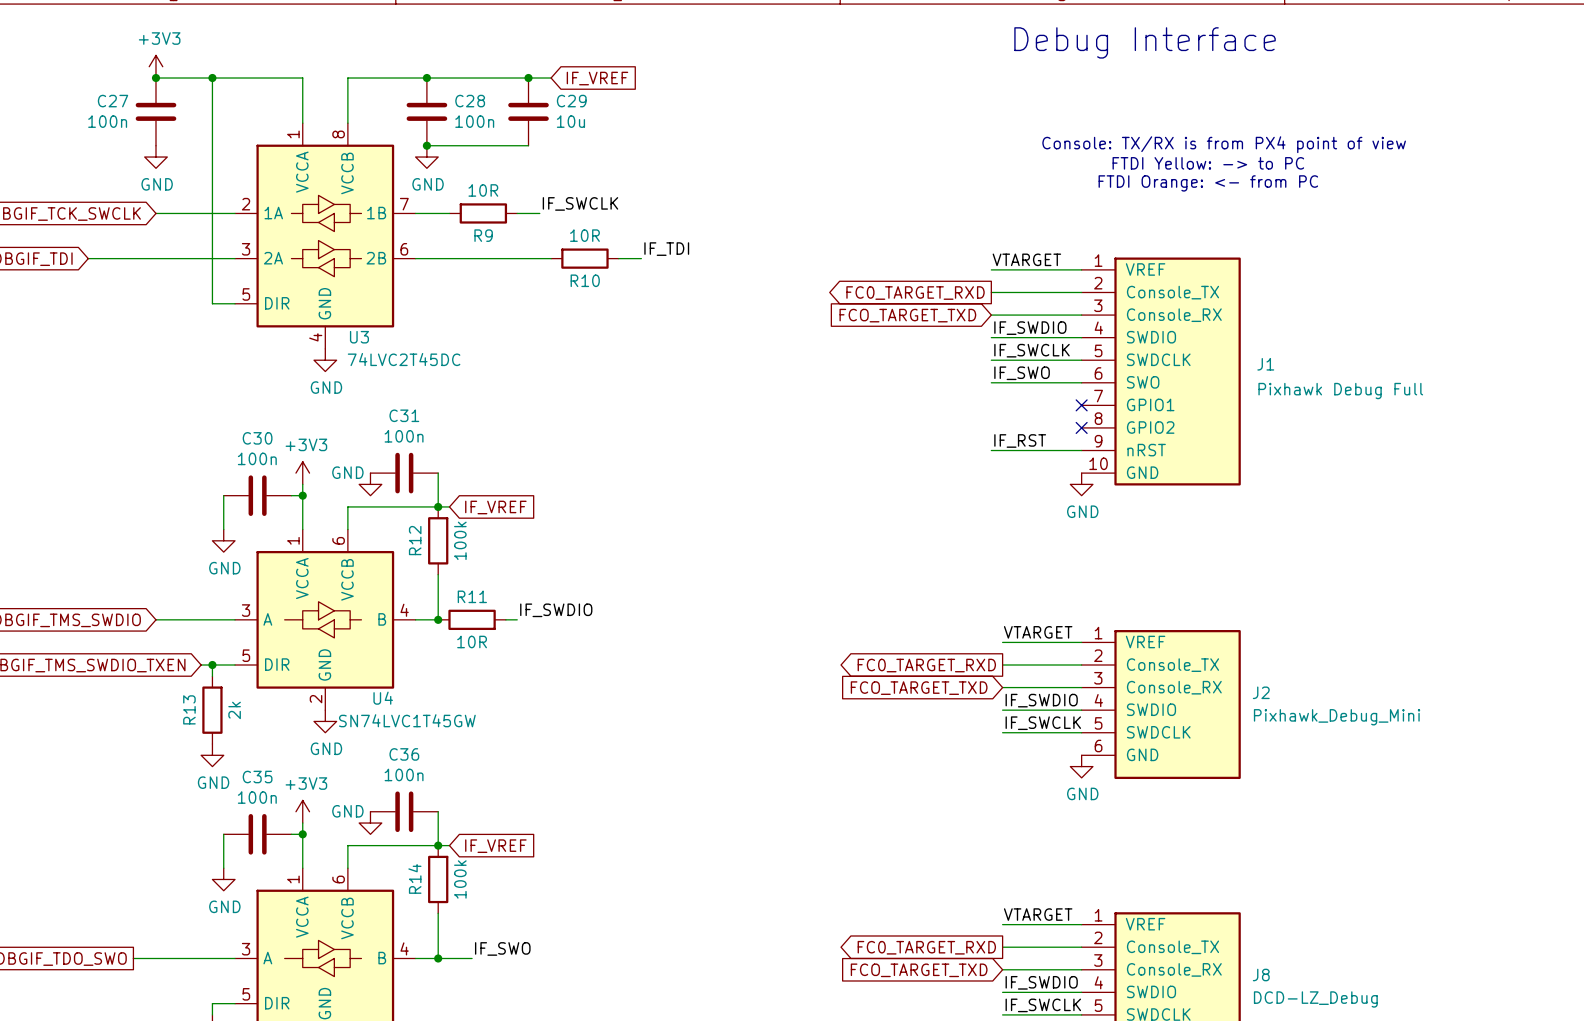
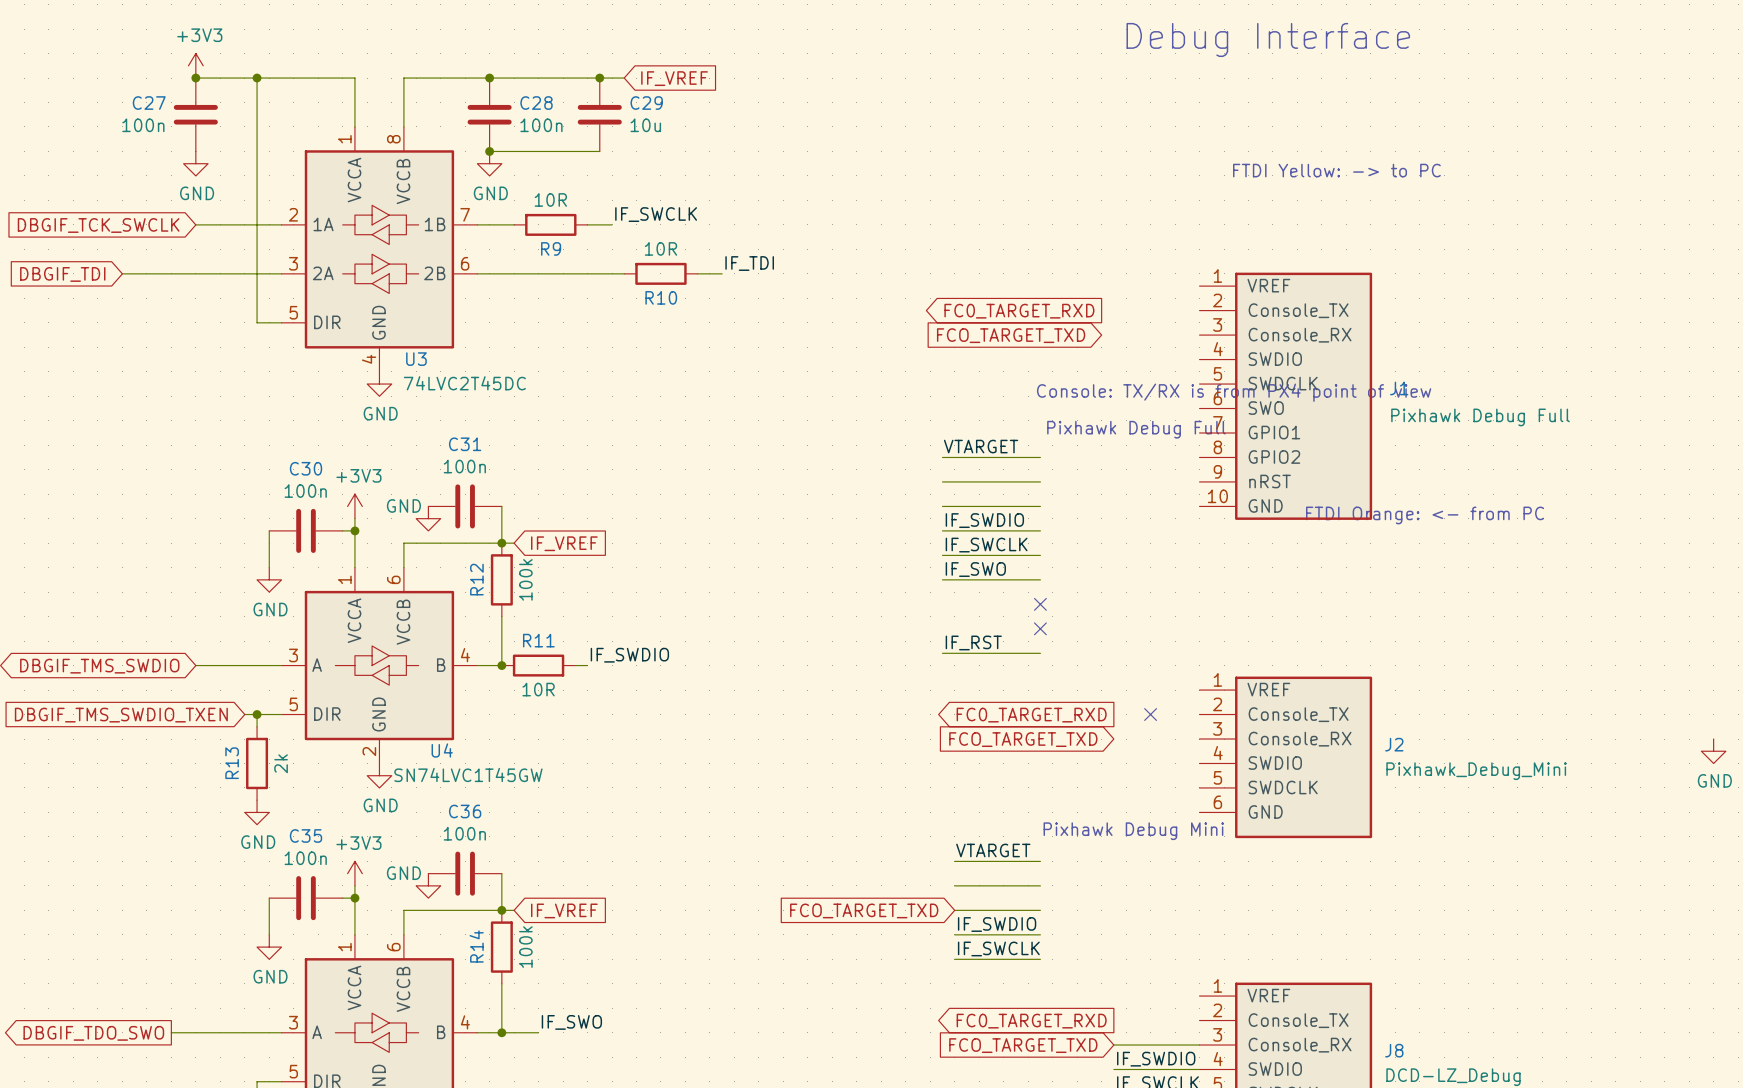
text: Console: TX/RX is from PX4 point of view (1224, 144) -> none
text: FTDI Orange: <- from PC (1208, 183) -> none
label: VTARGET (1026, 259) -> none
wire: (991, 269) (1081, 269) -> (942, 457) (1040, 457)
wire: (991, 292) (1081, 292) -> (942, 481) (1040, 481)
wire: (991, 315) (1081, 315) -> (942, 506) (1040, 506)
label: IF_SWDIO (1030, 328) -> none
wire: (991, 337) (1081, 337) -> (942, 530) (1040, 530)
label: IF_SWCLK (1032, 350) -> none
wire: (991, 360) (1081, 360) -> (942, 555) (1040, 555)
text: none -> Console: TX/RX is from PX4 point of view (1234, 392)
label position: IF_SWO (1022, 373) -> IF_SWO (975, 569)
wire: (991, 382) (1081, 382) -> (942, 579) (1040, 579)
text: none -> Pixhawk Debug Full (1136, 429)
no-connect mark: (1081, 405) -> none
label: none -> VTARGET (981, 446)
no-connect mark: (1081, 427) -> none
label position: IF_RST (1020, 440) -> IF_RST (973, 642)
wire: (991, 450) (1081, 450) -> (942, 653) (1040, 653)
text: none -> FTDI Orange: <- from PC (1425, 515)
power symbol: GND (1081, 484) -> none
label: none -> IF_SWDIO (984, 520)
label: none -> IF_SWCLK (986, 545)
no-connect mark: none -> (1040, 604)
no-connect mark: none -> (1040, 628)
label: VTARGET (1038, 632) -> none
wire: (1002, 642) (1081, 642) -> (954, 861) (1040, 861)
wire: (1002, 665) (1081, 665) -> (954, 885) (1040, 885)
no-connect mark: none -> (1150, 714)
wire: (1002, 687) (1081, 687) -> (954, 910) (1040, 910)
power symbol: none -> GND (1713, 751)
label: IF_SWDIO (1041, 700) -> none
wire: (1002, 710) (1081, 710) -> (954, 934) (1040, 934)
label: IF_SWCLK (1043, 723) -> none
wire: (1002, 732) (1081, 732) -> (954, 959) (1040, 959)
power symbol: GND (1081, 766) -> none
text: none -> Pixhawk Debug Mini (1133, 831)
label: none -> VTARGET (993, 850)
global label: none -> FCO_TARGET_TXD (864, 910)
label: none -> IF_SWDIO (997, 924)
label: none -> IF_SWCLK (998, 948)
label: VTARGET (1038, 914) -> none
wire: (1002, 924) (1081, 924) -> none
wire: (1002, 947) (1081, 947) -> none

